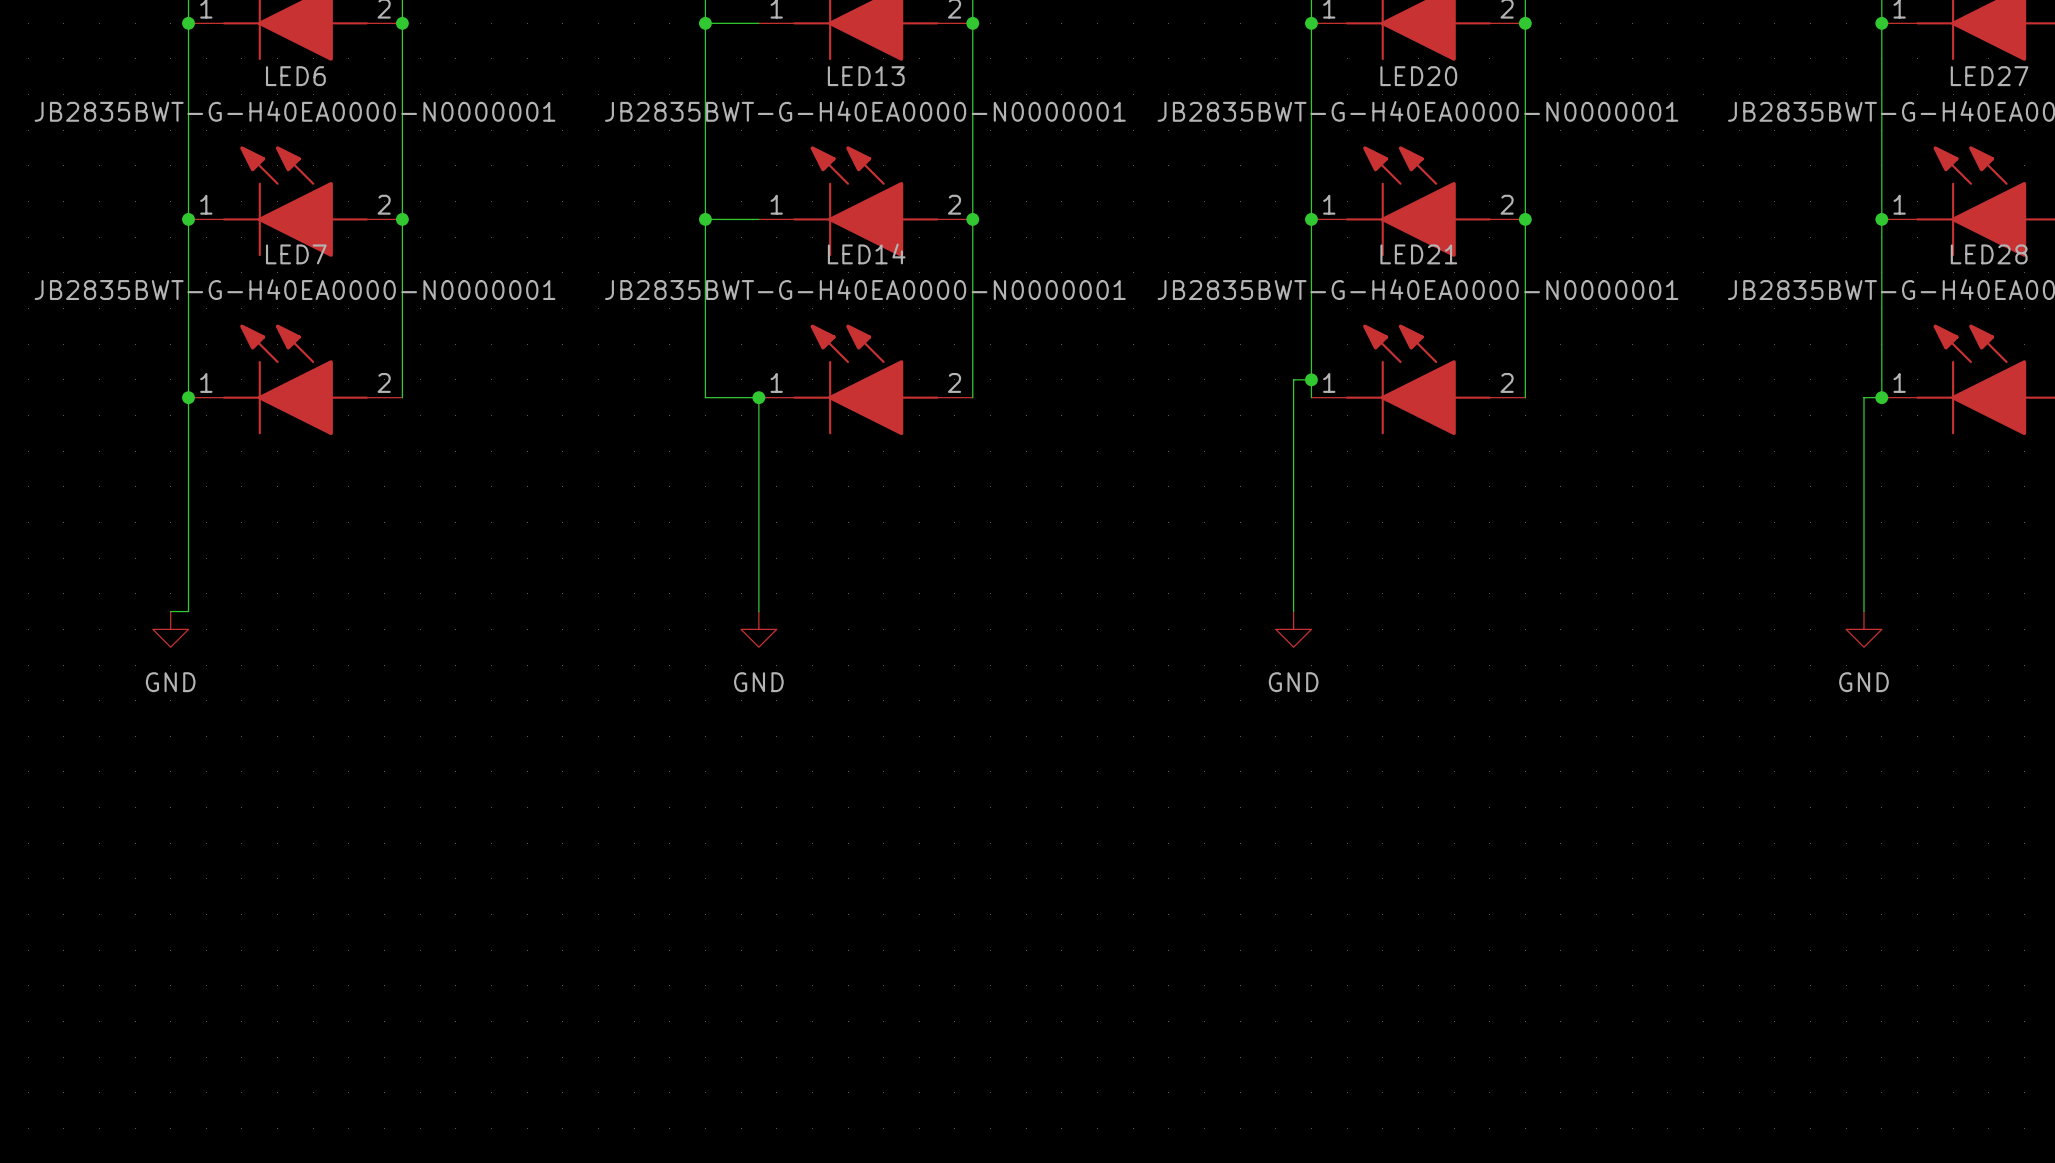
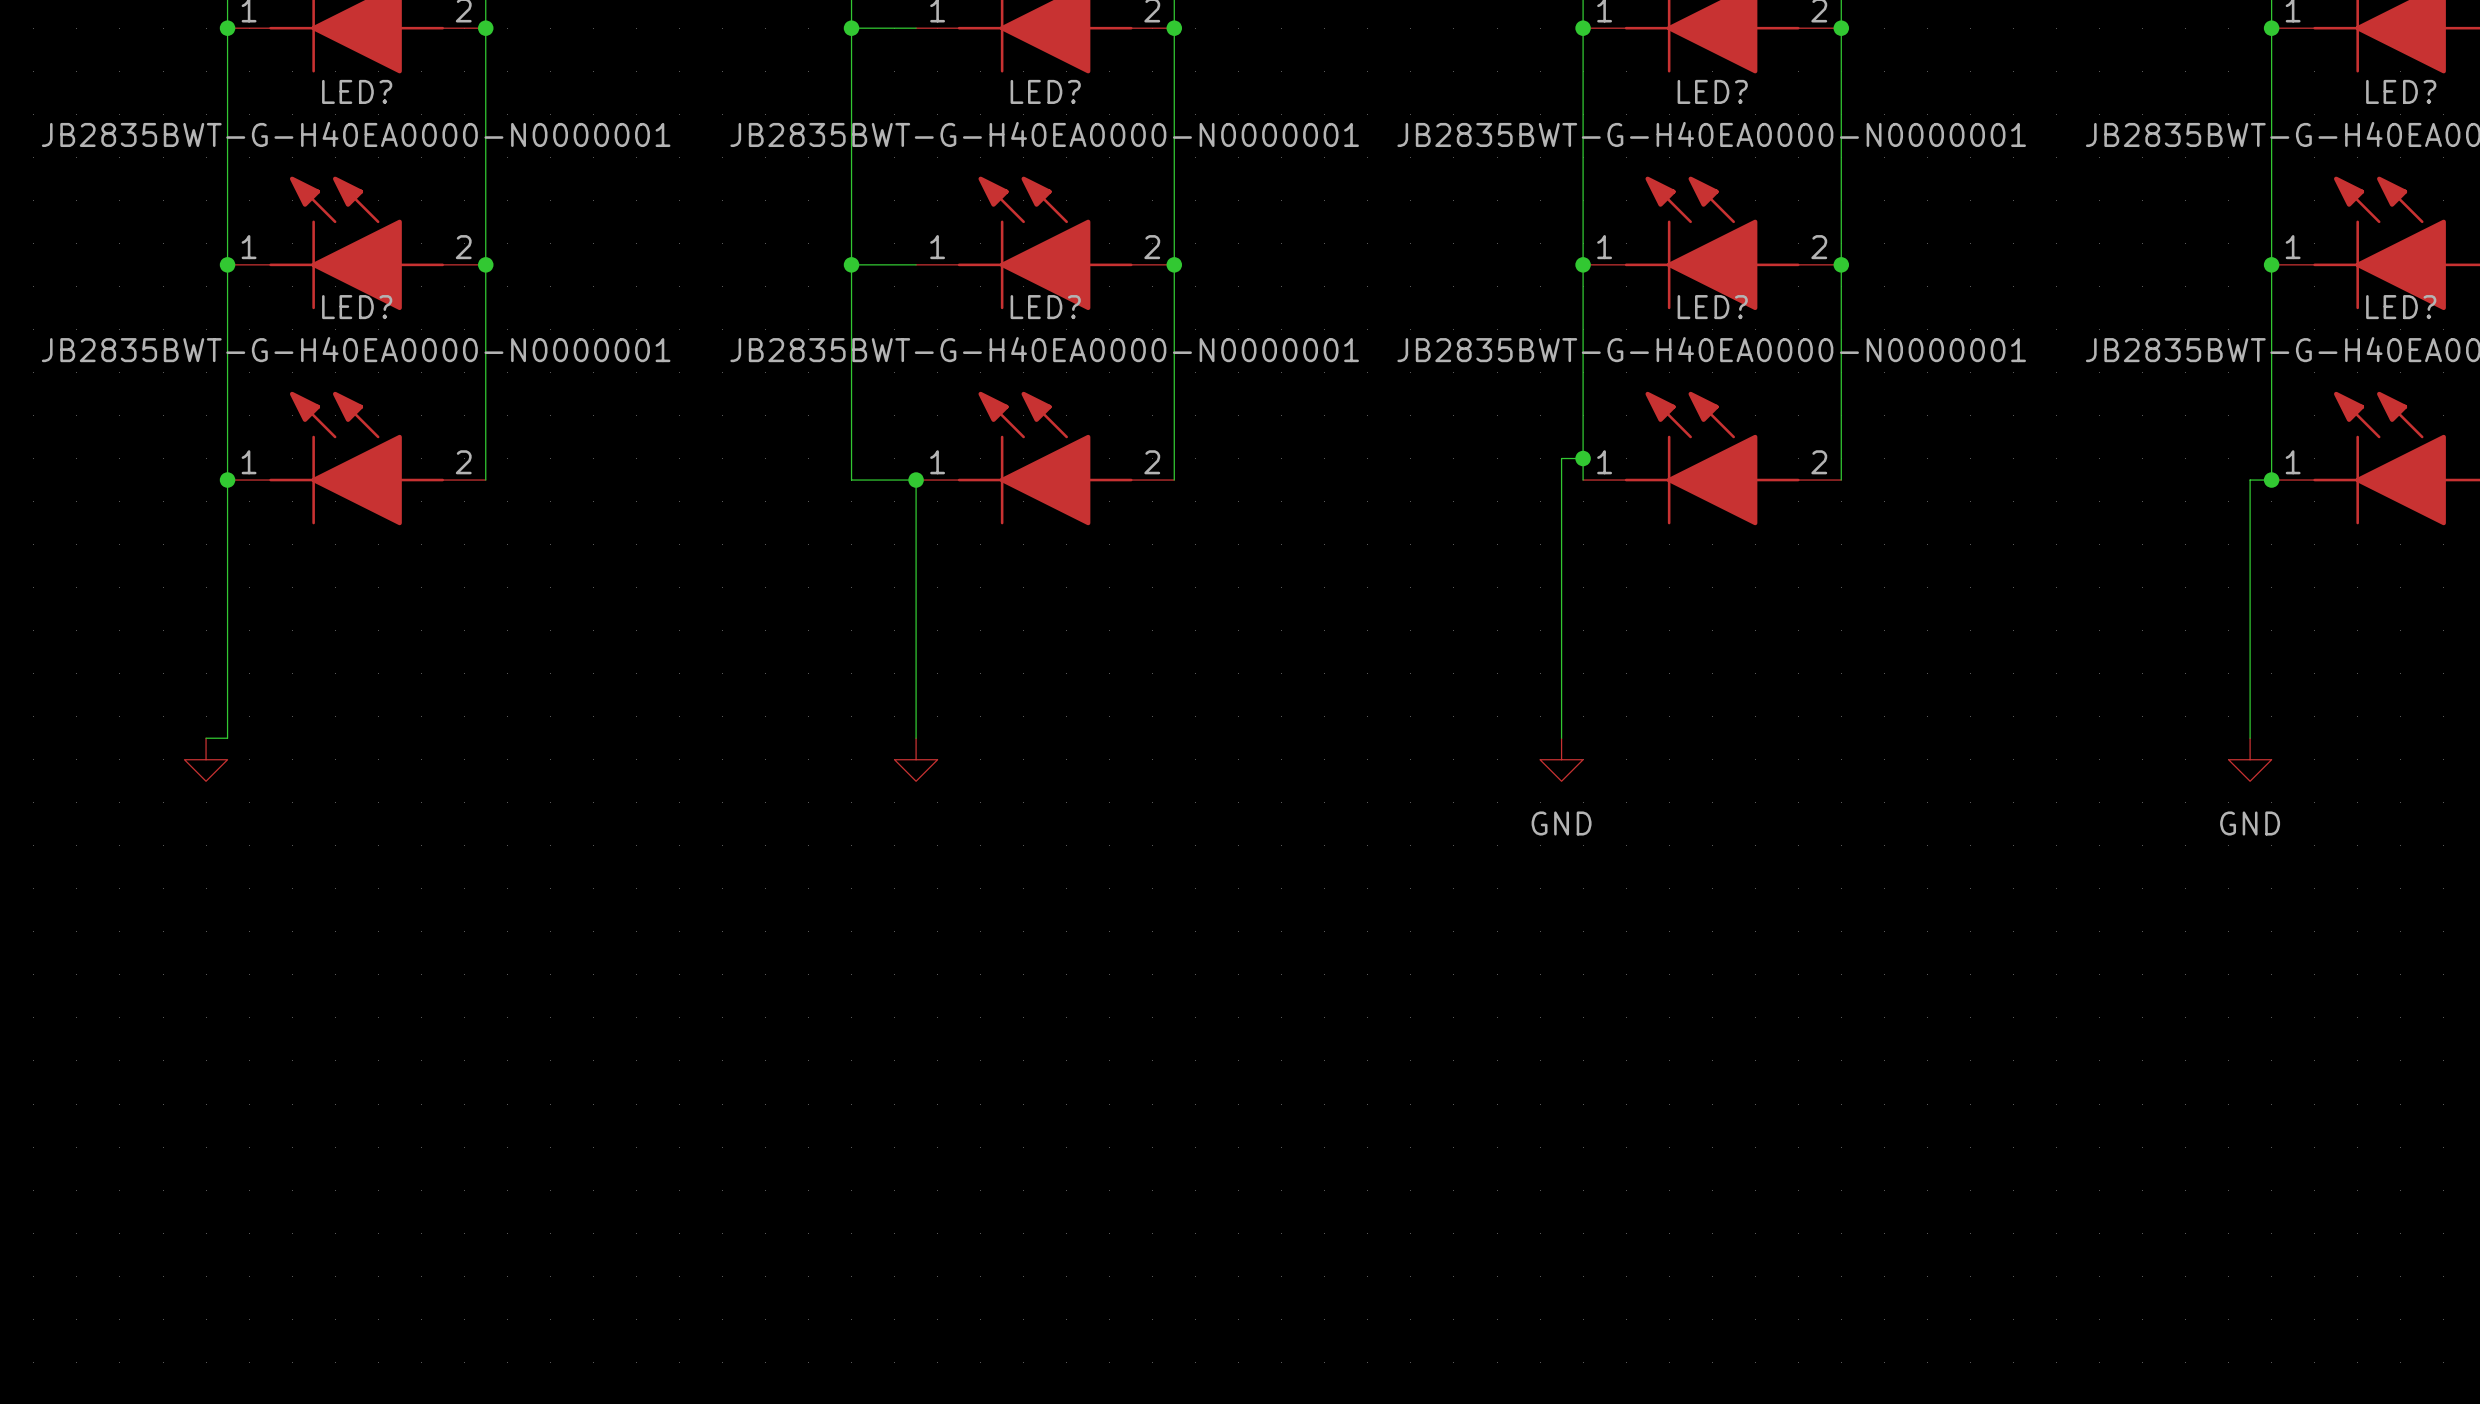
LED6 name: LED6 (295, 76) -> LED? (357, 91)
LED13 name: LED13 (866, 76) -> LED? (1045, 91)
LED20 name: LED20 (1418, 76) -> LED? (1712, 91)
LED27 name: LED27 (1989, 76) -> LED? (2401, 91)
LED14 name: LED14 (866, 253) -> LED? (1045, 307)
LED7 name: LED7 (296, 254) -> LED? (357, 307)
LED21 name: LED21 (1418, 254) -> LED? (1712, 307)
LED28 name: LED28 (1989, 254) -> LED? (2401, 307)
power symbol text: GND (170, 682) -> none
power symbol text: GND (758, 682) -> none

